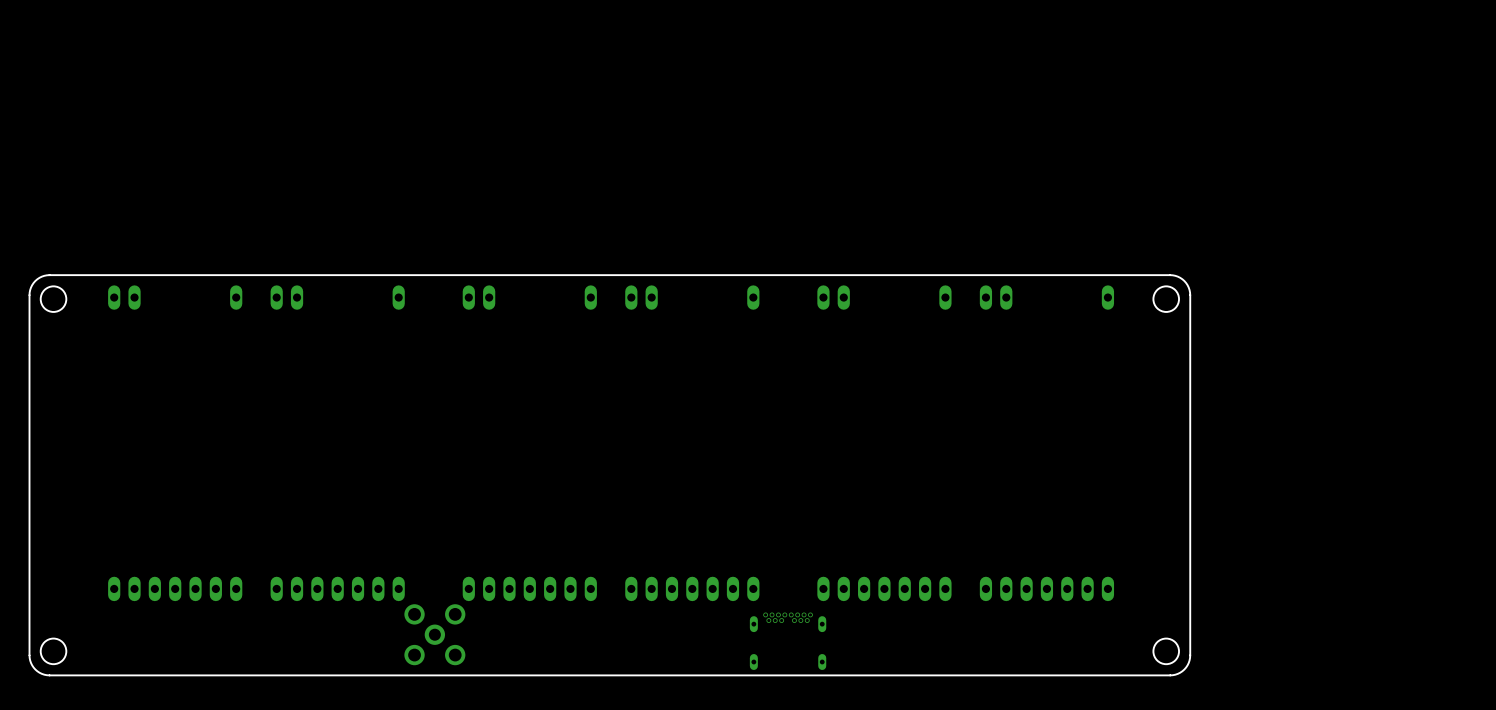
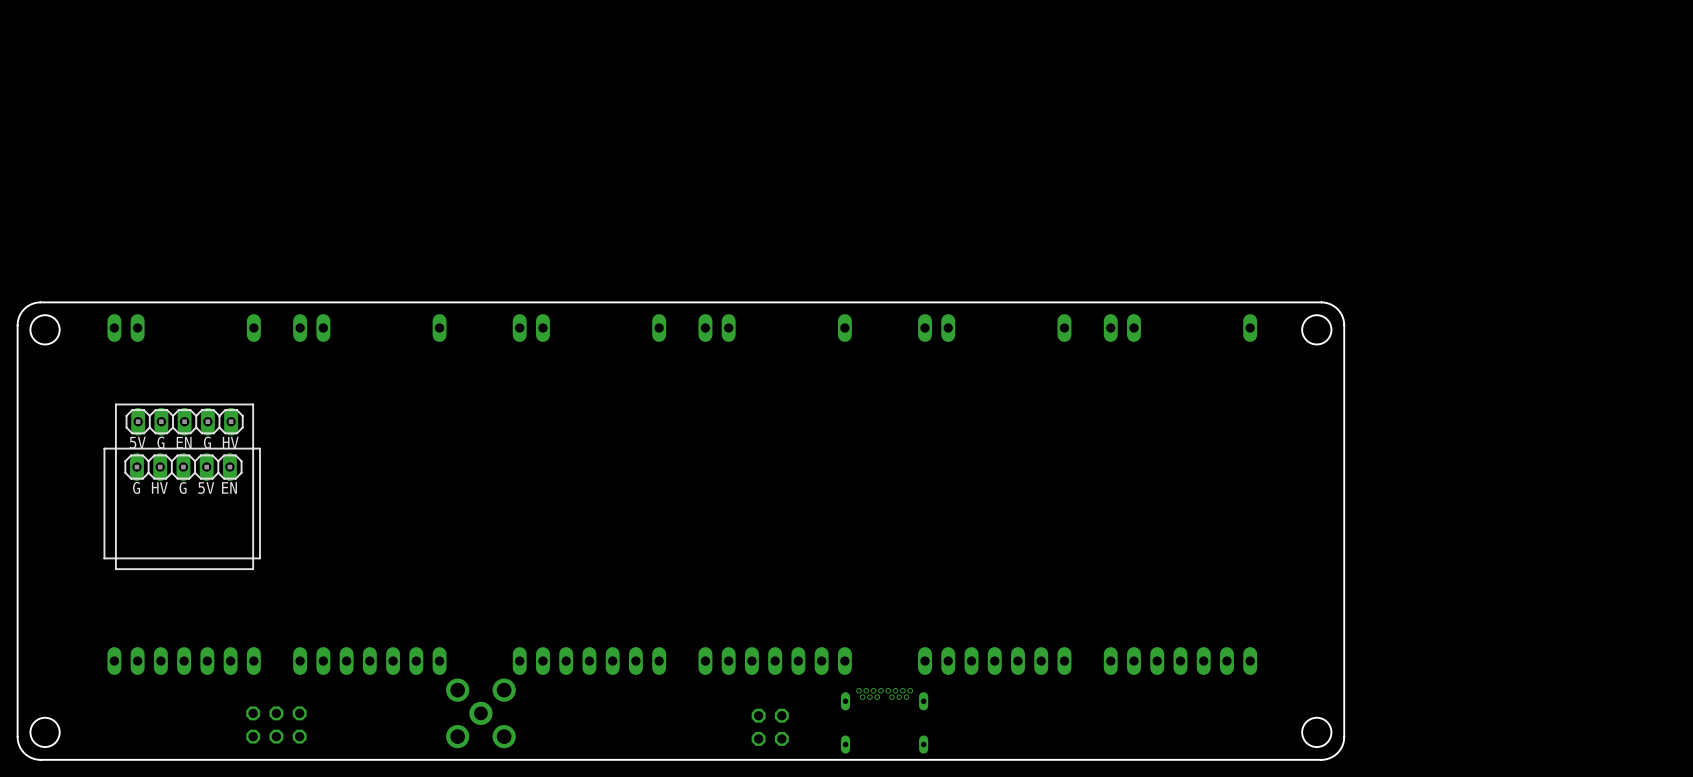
part: none -> (184, 486)
part: none -> (182, 503)
part: none -> (276, 724)
part: none -> (770, 727)

